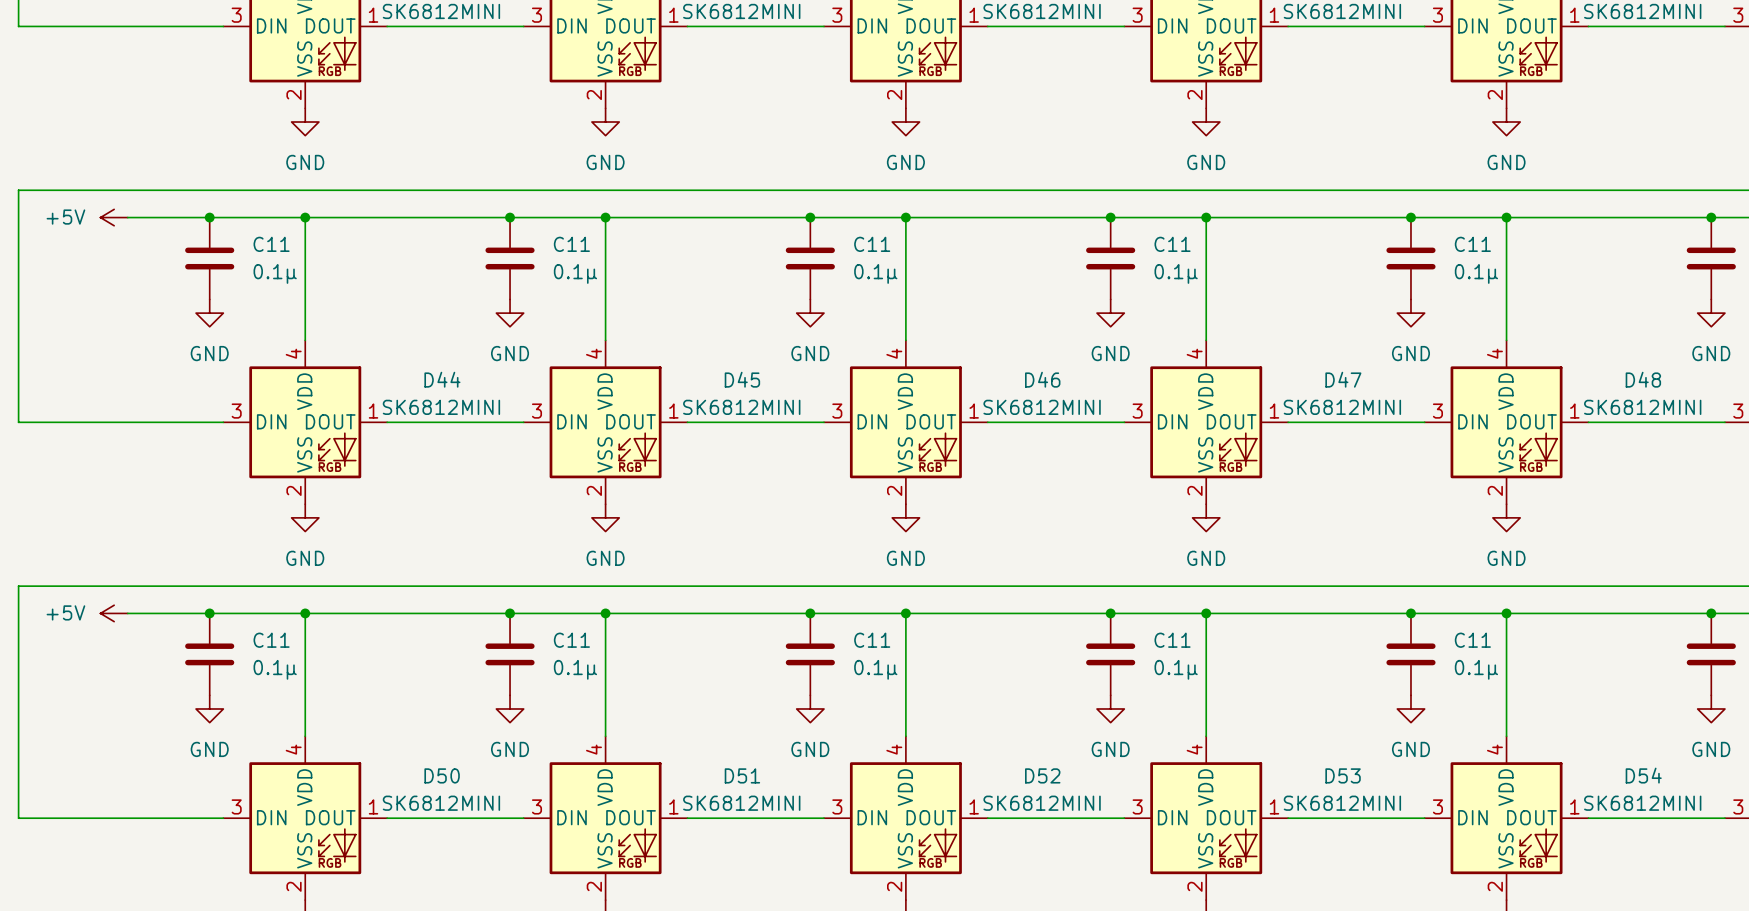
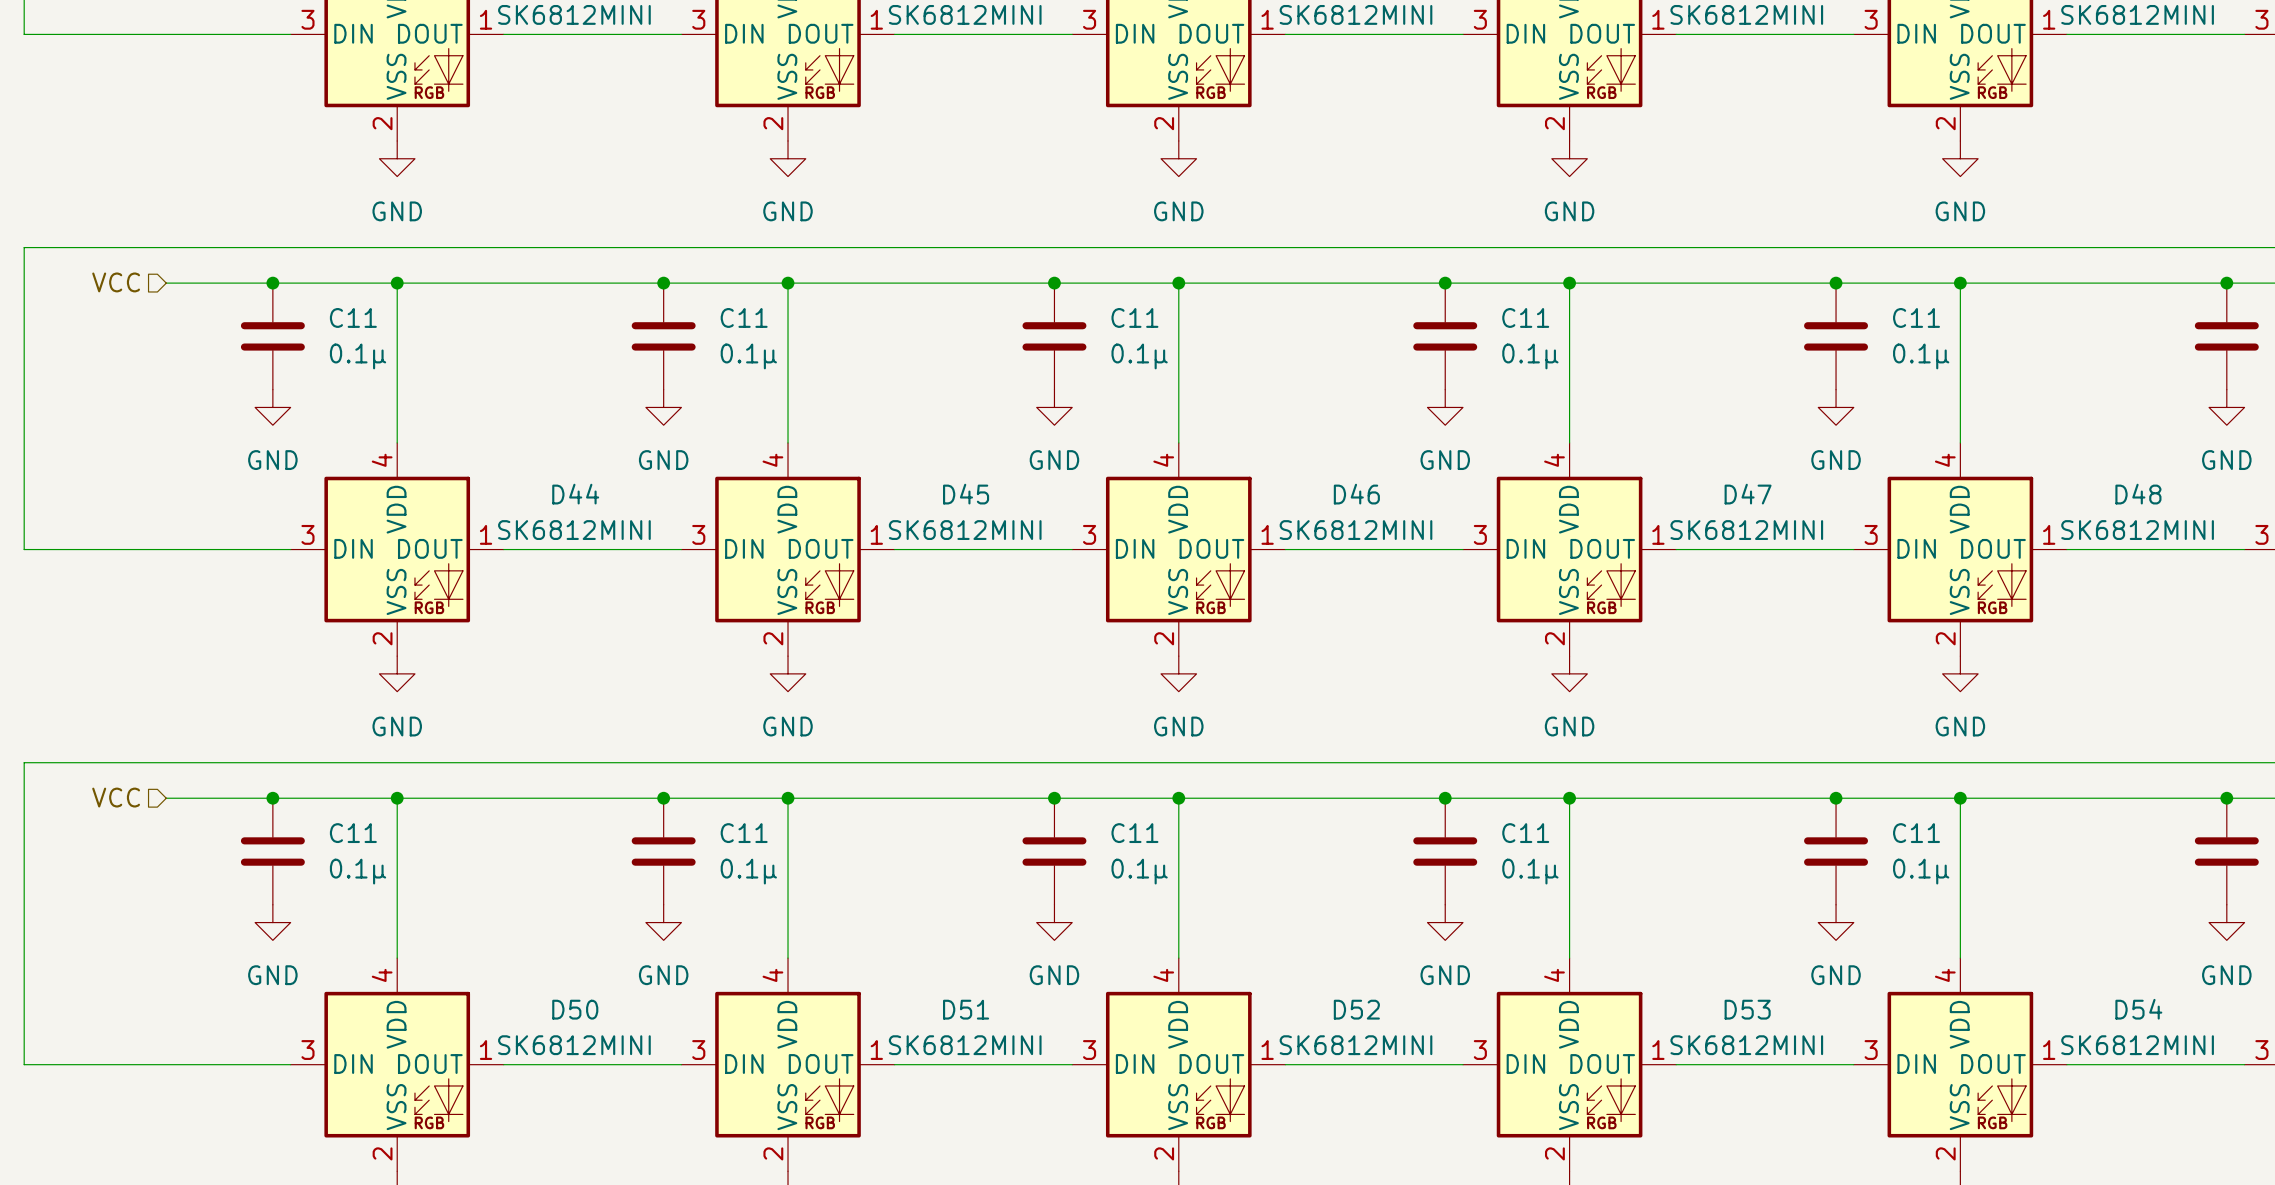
hierarchical label: none -> VCC (116, 282)
power symbol: +5V (114, 217) -> none
hierarchical label: none -> VCC (116, 797)
power symbol: +5V (114, 613) -> none

